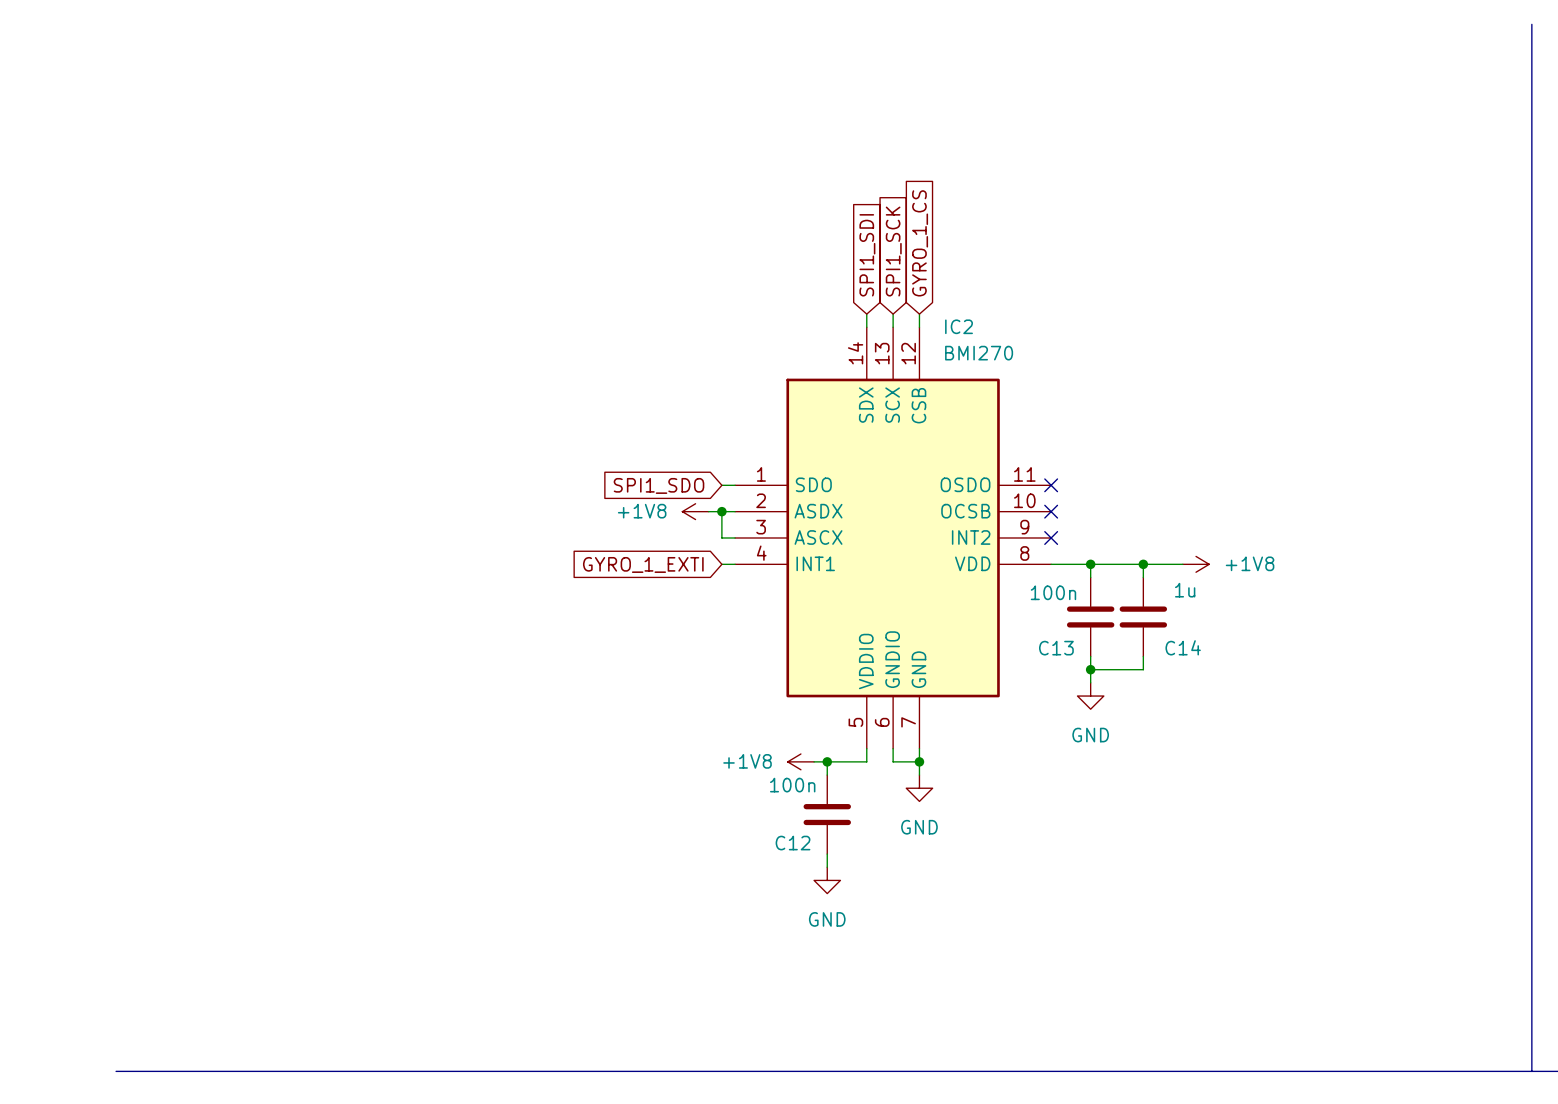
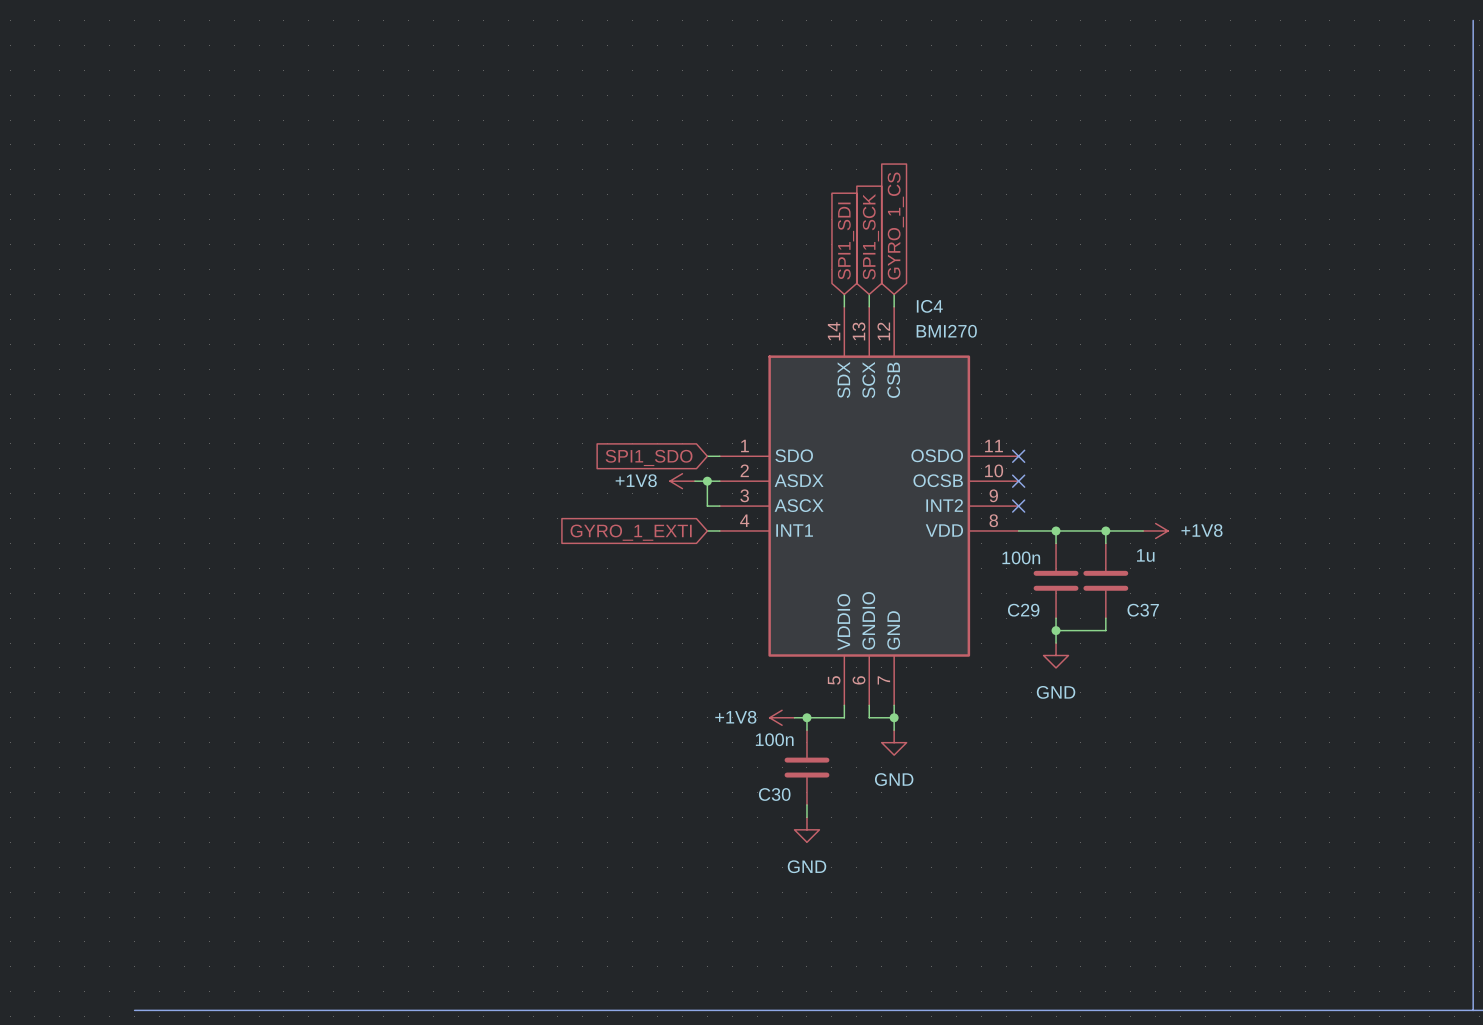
IC2 name: IC2 (959, 326) -> IC4 (929, 306)
C14 name: C14 (1183, 647) -> C37 (1143, 610)
C13 name: C13 (1056, 648) -> C29 (1023, 610)
C12 name: C12 (793, 843) -> C30 (774, 794)

